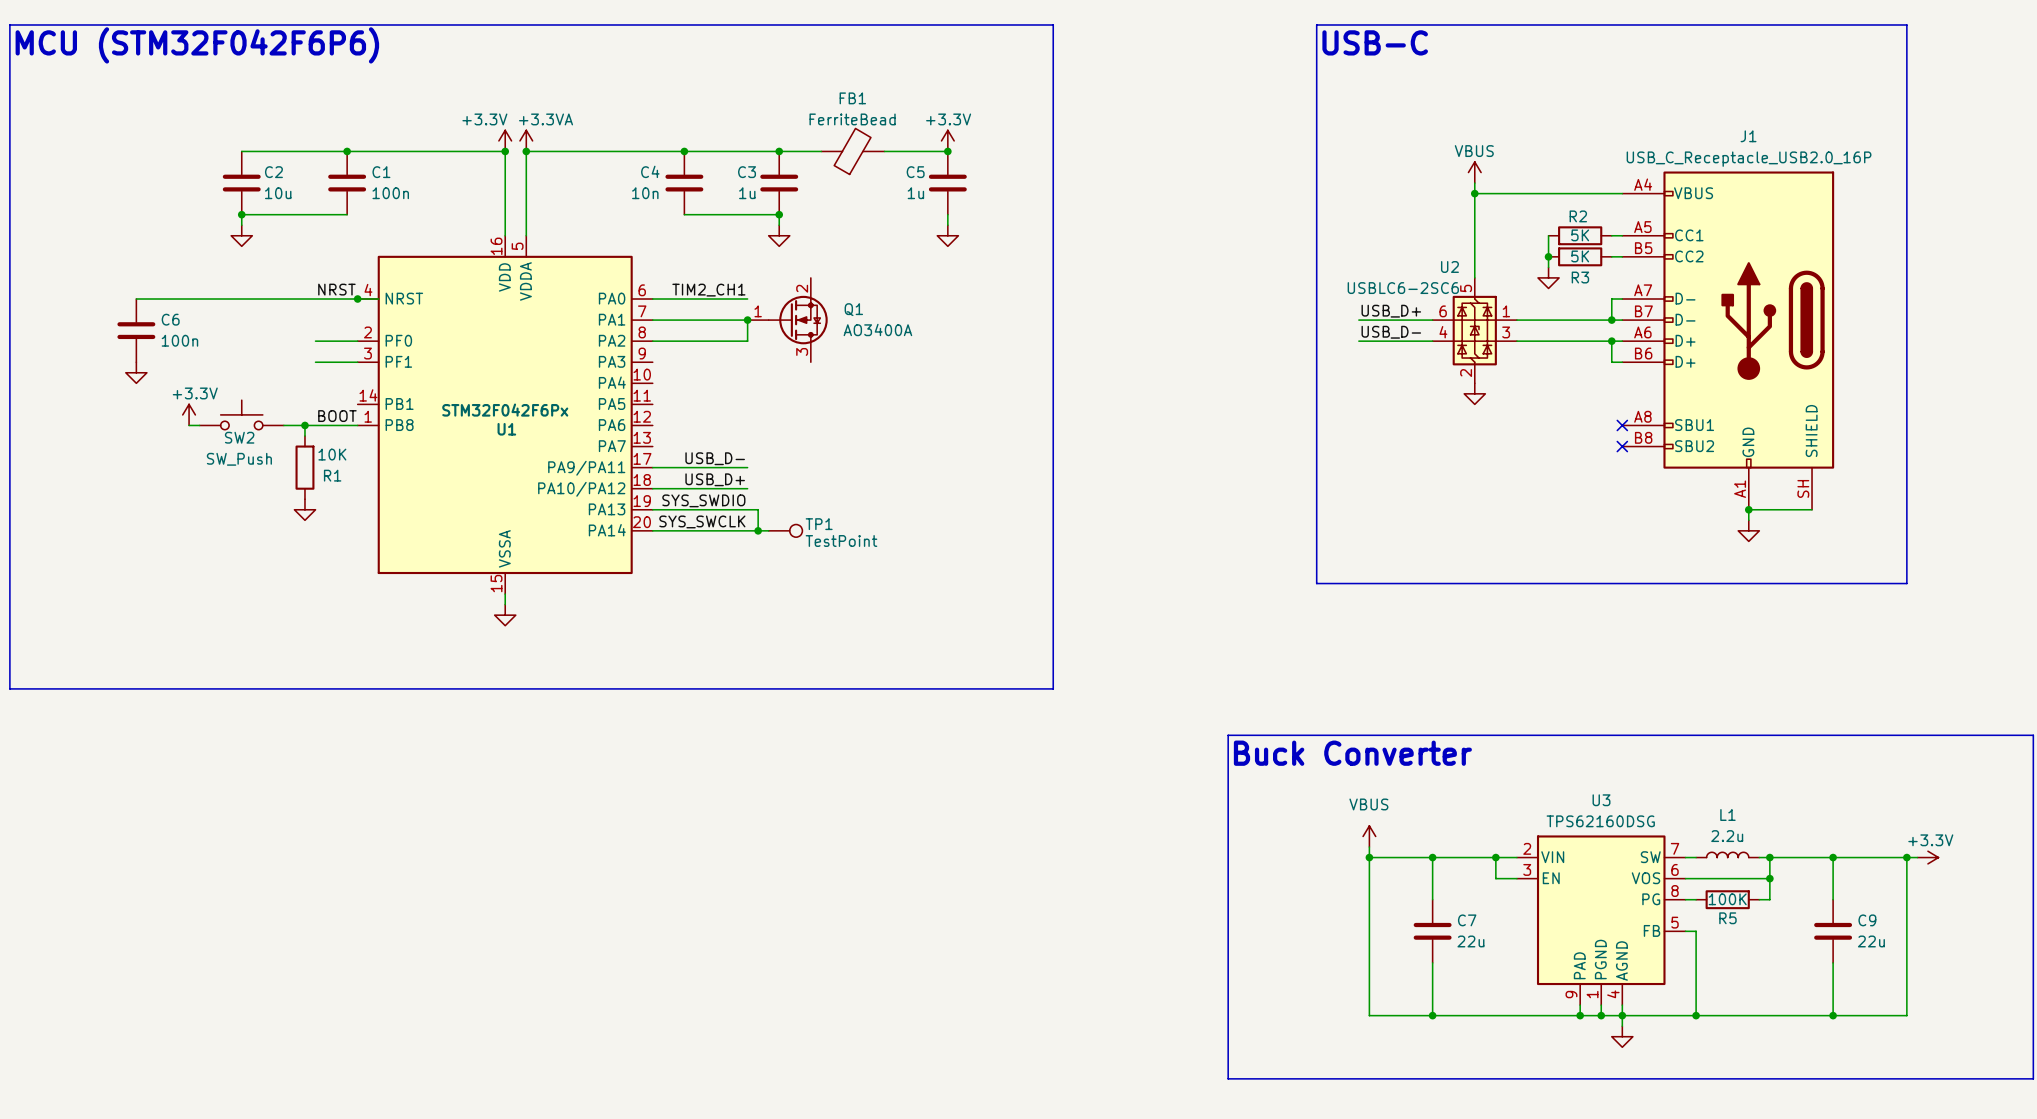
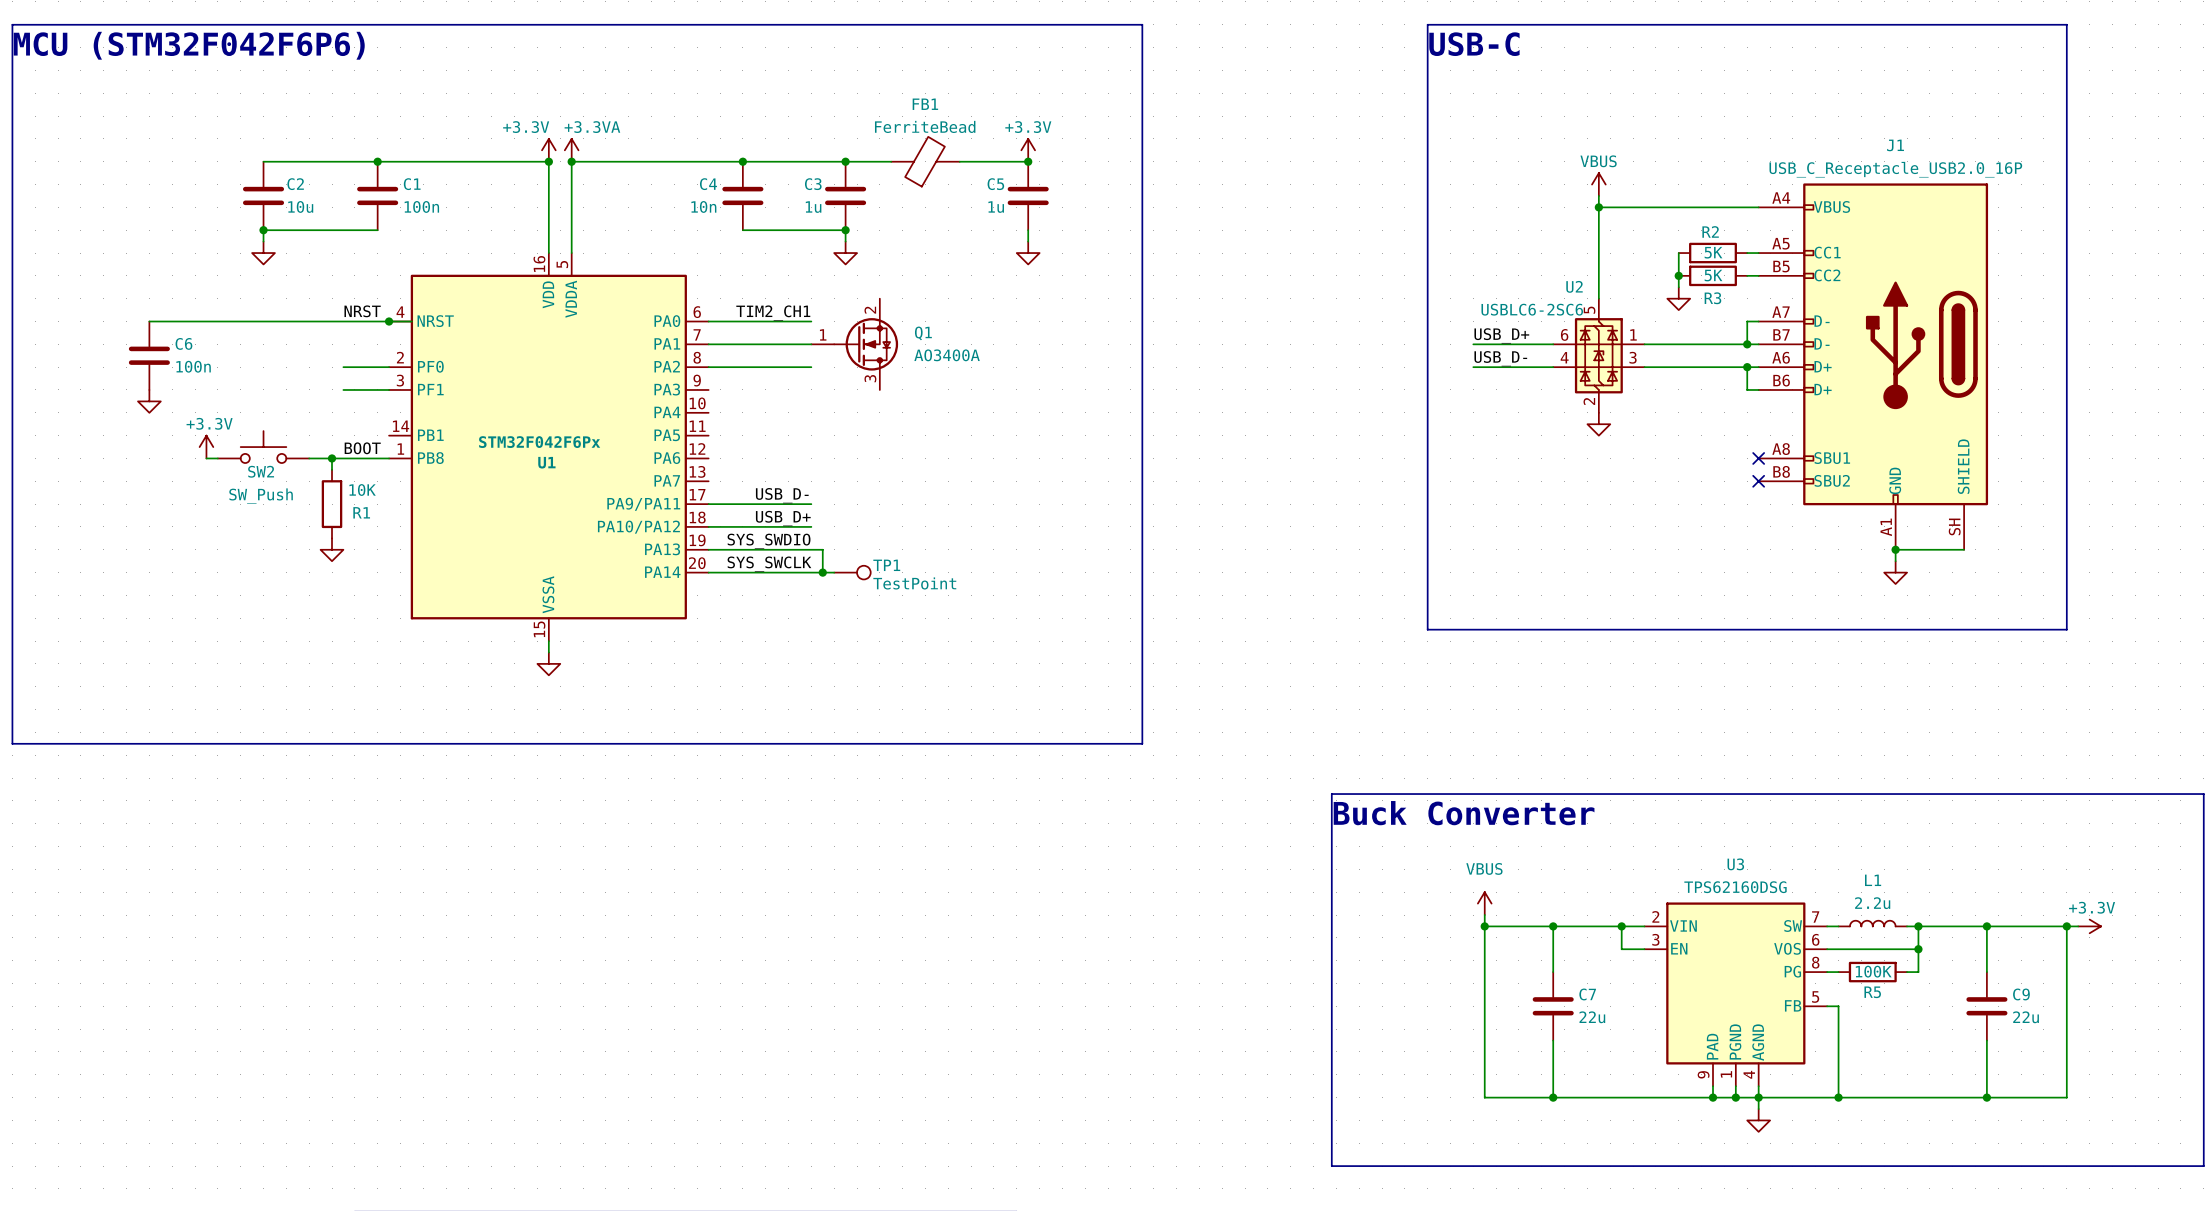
wire: (747, 320) (747, 341) -> none
junction: (747, 320) -> none

